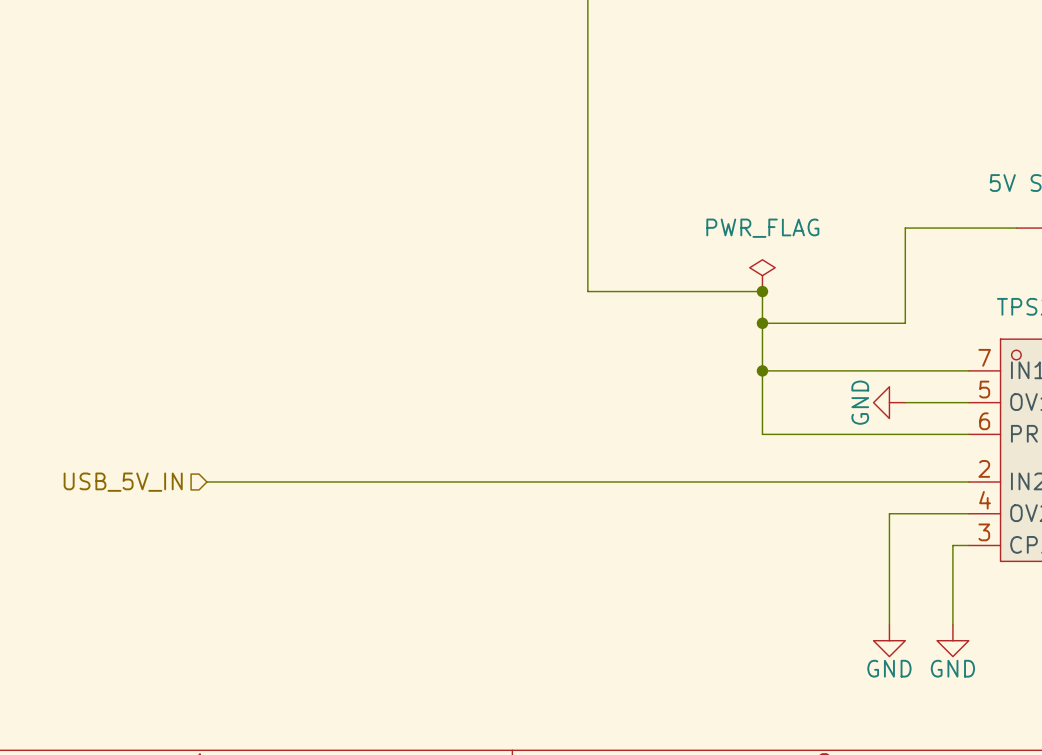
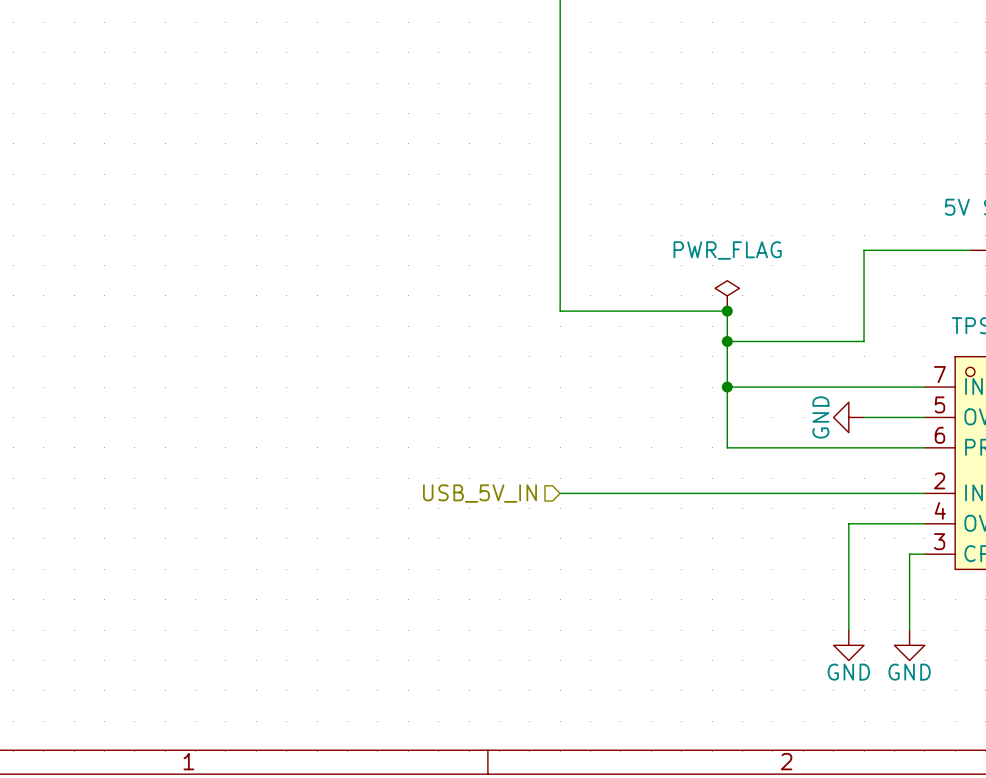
hierarchical label: USB_5V_IN (123, 482) -> none
wire: (206, 482) (587, 482) -> none
hierarchical label: none -> USB_5V_IN (479, 493)

